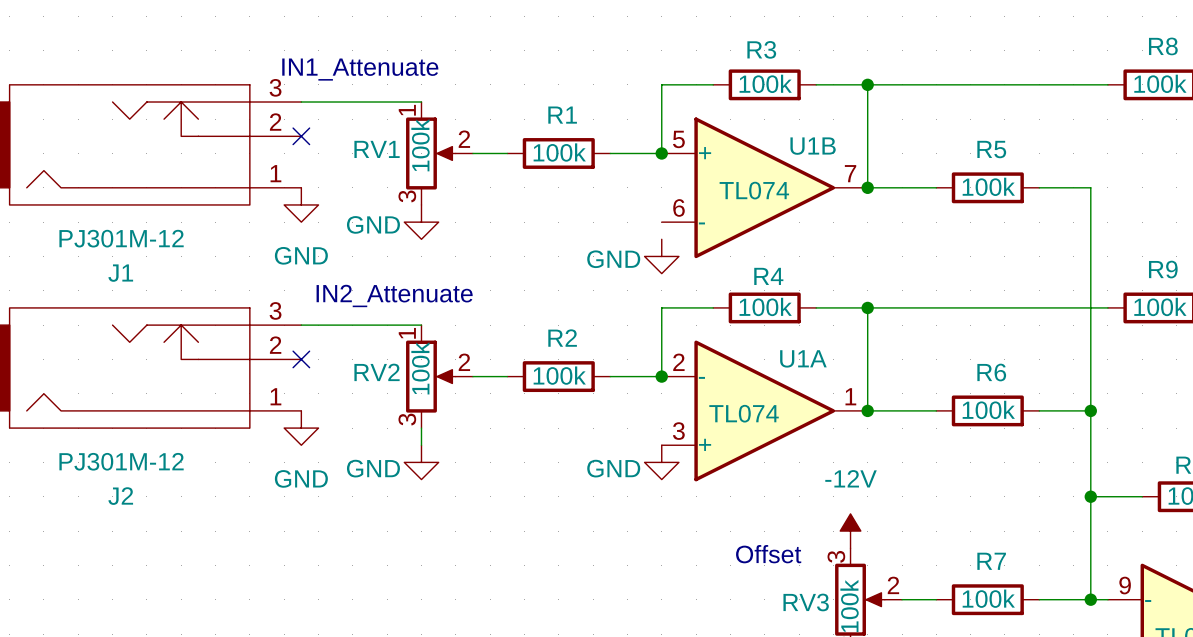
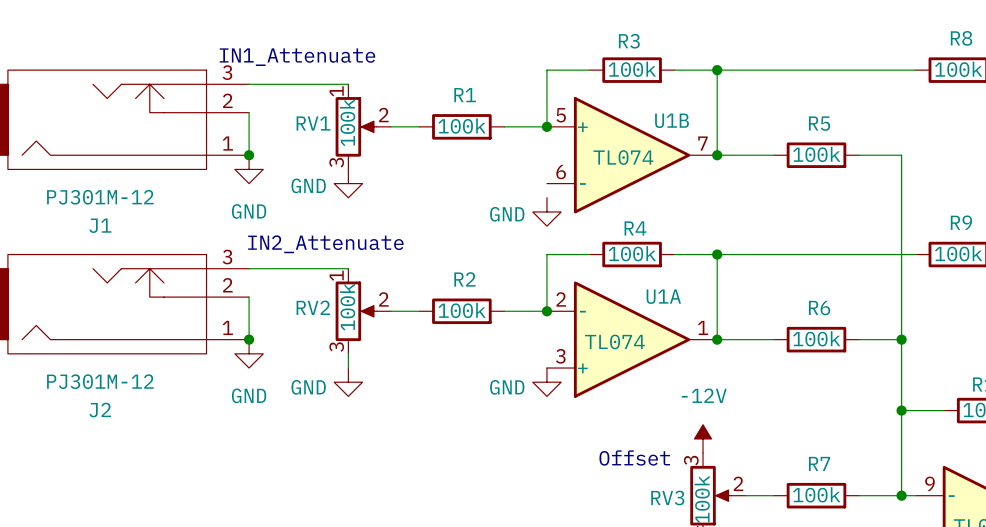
wire: none -> (249, 112) (249, 155)
no-connect mark: (301, 136) -> none
junction: none -> (249, 155)
wire: none -> (249, 297) (249, 339)
no-connect mark: (301, 359) -> none
junction: none -> (249, 339)

